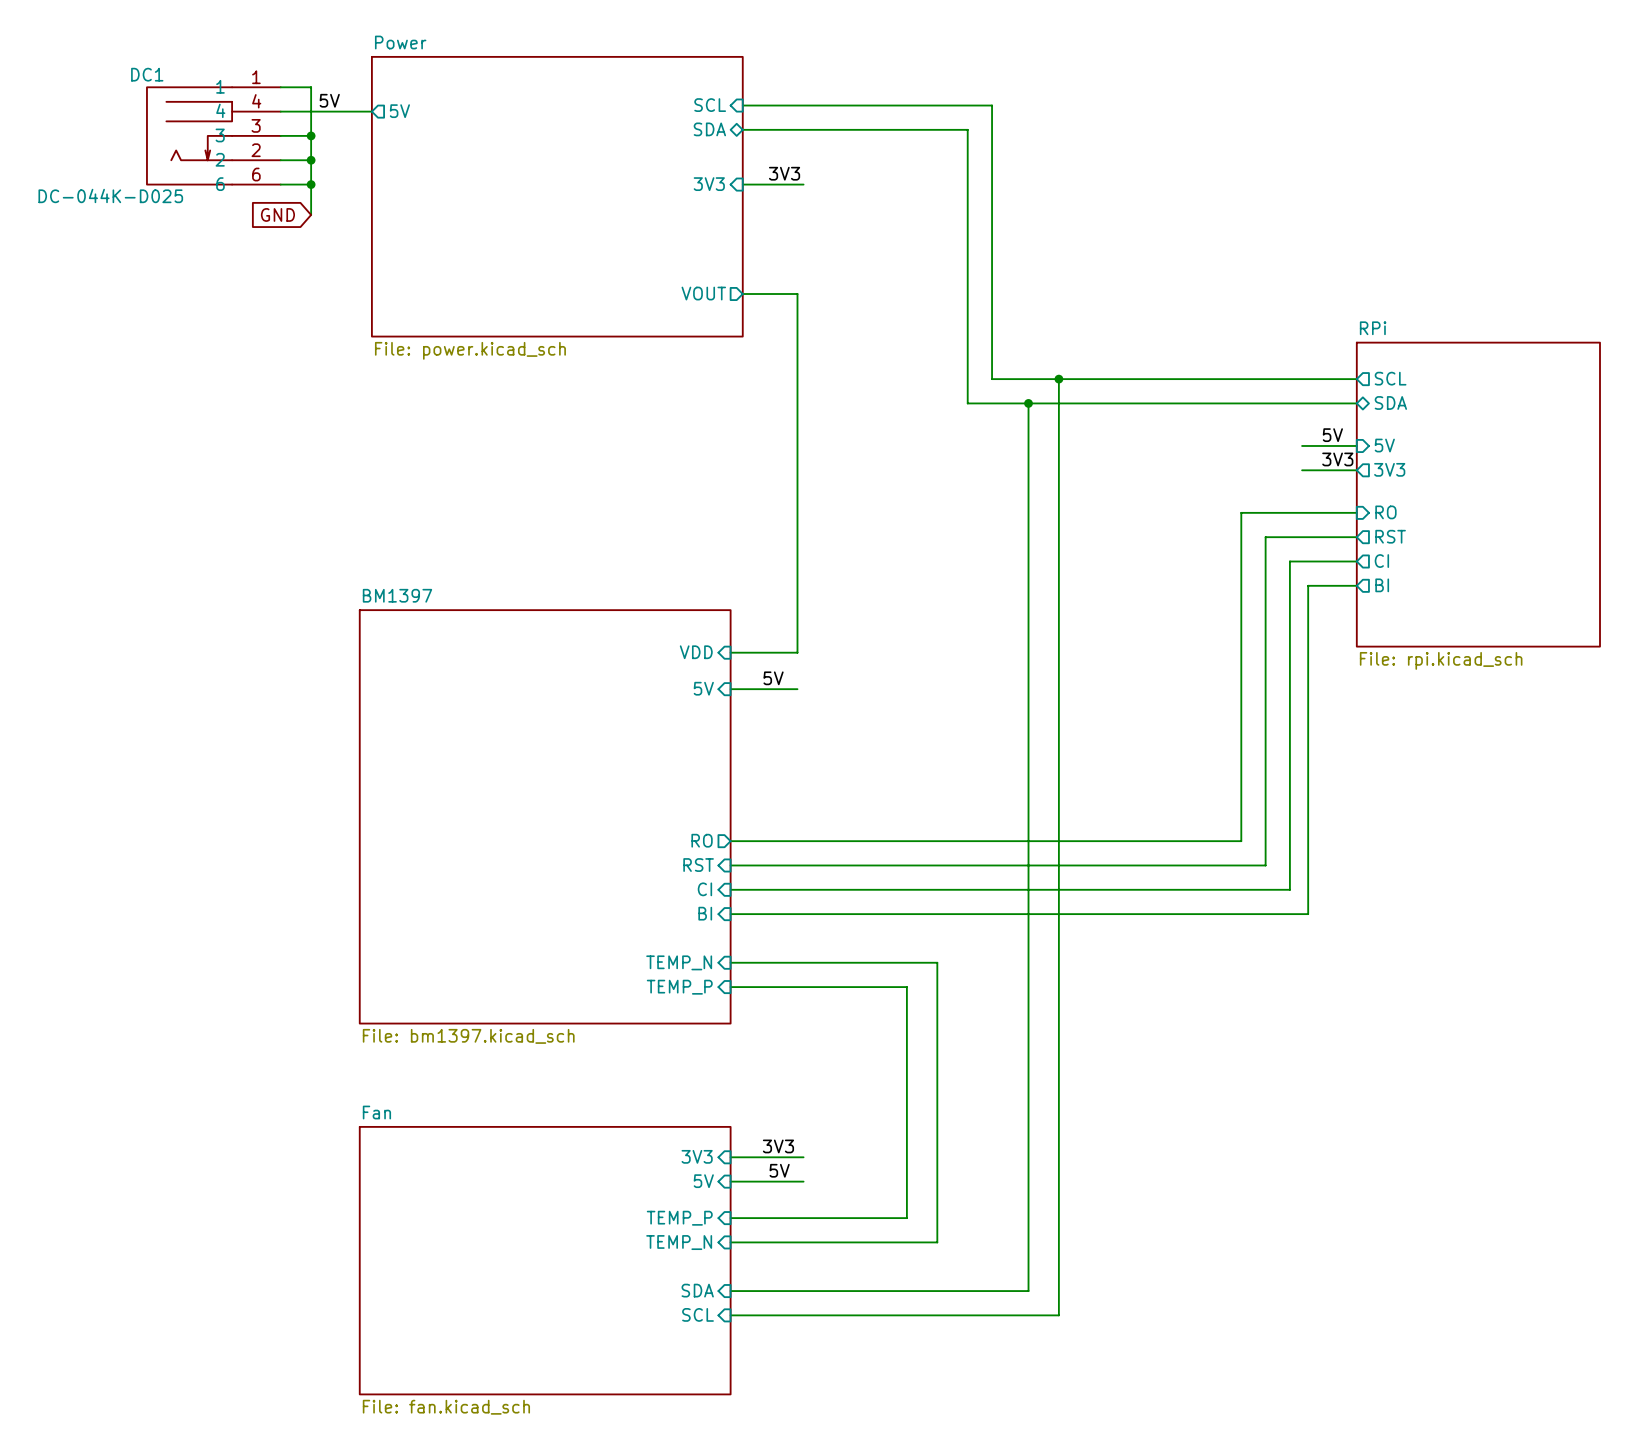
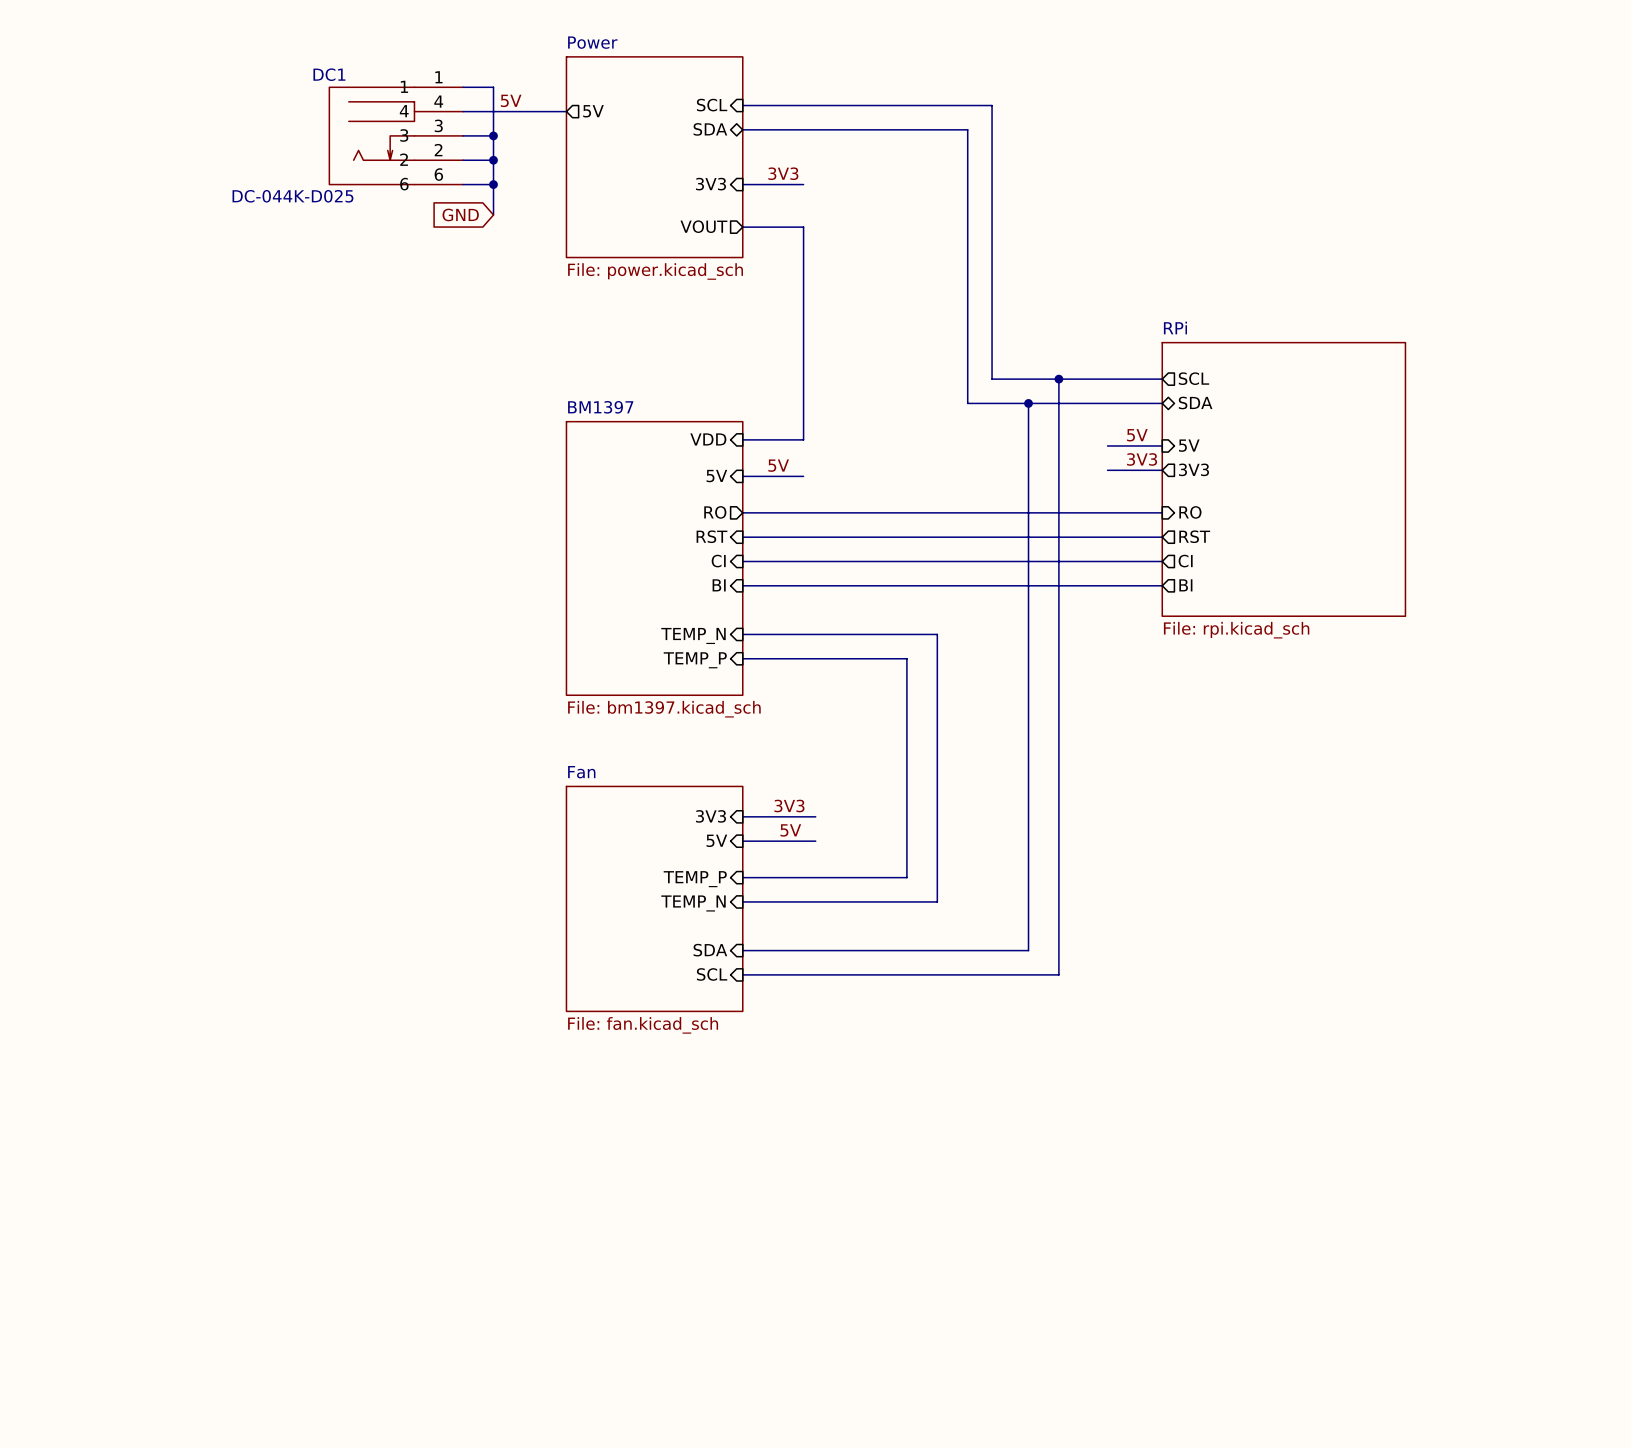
wire: (280, 87) (311, 87) (311, 214) -> (463, 87) (493, 87) (493, 214)
label position: 5V (329, 100) -> 5V (511, 100)
wire: (280, 111) (371, 111) -> none
sheet pin position: 5V (399, 111) -> 5V (593, 111)
wire: none -> (463, 111) (566, 111)
DC1 position: (213, 135) -> (396, 135)
wire: (280, 135) (311, 135) -> (463, 135) (493, 135)
junction: (311, 135) -> none
junction: none -> (493, 135)
sheet Power: none -> File: power.kicad_sch (654, 157)
wire: (280, 160) (311, 160) -> (463, 160) (493, 160)
junction: (311, 160) -> none
junction: none -> (493, 160)
wire: (280, 184) (311, 184) -> (463, 184) (493, 184)
junction: (311, 184) -> none
junction: none -> (493, 184)
sheet Power: File: power.kicad_sch (557, 196) -> none
global label position: GND (277, 214) -> GND (460, 214)
wire: none -> (742, 227) (803, 227) (803, 439) (742, 439)
sheet pin position: VOUT (703, 293) -> VOUT (703, 226)
wire: (742, 294) (797, 294) (797, 652) (730, 652) -> none
sheet pin position: SCL (1390, 378) -> SCL (1193, 378)
wire: (1162, 379) (1356, 379) -> none
sheet pin position: SDA (1390, 402) -> SDA (1195, 402)
wire: (1162, 403) (1356, 403) -> none
label position: 5V (1332, 435) -> 5V (1137, 435)
wire: (1302, 445) (1356, 445) -> (1107, 445) (1162, 445)
sheet pin position: 5V (1384, 445) -> 5V (1189, 445)
label position: 3V3 (1337, 459) -> 3V3 (1142, 459)
label: none -> 5V (778, 465)
sheet pin position: 3V3 (1389, 469) -> 3V3 (1193, 469)
wire: (1302, 470) (1356, 470) -> (1107, 470) (1162, 470)
sheet pin: none -> 5V (716, 476)
wire: none -> (742, 476) (803, 476)
sheet RPi: none -> File: rpi.kicad_sch (1283, 479)
sheet RPi: File: rpi.kicad_sch (1478, 494) -> none
sheet pin: none -> RO (715, 512)
wire: none -> (742, 512) (1162, 512)
wire: (1356, 512) (1241, 512) (1241, 841) (815, 841) -> none
sheet pin position: RO (1385, 512) -> RO (1190, 512)
sheet pin: none -> RST (711, 536)
sheet pin position: RST (1390, 536) -> RST (1194, 536)
wire: none -> (742, 537) (1162, 537)
wire: (1356, 537) (1265, 537) (1265, 865) (730, 865) -> none
sheet pin: none -> CI (718, 561)
wire: none -> (742, 561) (1162, 561)
wire: (1356, 561) (1289, 561) (1289, 889) (730, 889) -> none
sheet pin position: CI (1381, 561) -> CI (1185, 561)
sheet pin: none -> BI (719, 585)
wire: none -> (742, 585) (1162, 585)
wire: (1356, 585) (1308, 585) (1308, 914) (730, 914) -> none
sheet pin position: BI (1382, 585) -> BI (1185, 585)
sheet BM1397 name position: BM1397 (397, 595) -> BM1397 (600, 407)
sheet BM1397 shape: [359, 609, 732, 1025] -> [565, 420, 744, 696]
sheet pin: none -> TEMP_N (693, 635)
wire: none -> (742, 634) (937, 634) (937, 901) (742, 901)
sheet pin position: VDD (696, 652) -> VDD (708, 439)
sheet pin: none -> TEMP_P (695, 660)
wire: none -> (742, 658) (906, 658) (906, 877) (742, 877)
label: 5V (773, 678) -> none
sheet pin: 5V (703, 688) -> none
wire: (730, 689) (797, 689) -> none
label: none -> 3V3 (789, 806)
sheet pin: none -> 3V3 (710, 816)
wire: none -> (742, 816) (815, 816)
label: none -> 5V (790, 830)
sheet pin: RO (702, 840) -> none
sheet pin: none -> 5V (716, 840)
wire: (730, 841) (742, 841) -> none
sheet pin: RST (698, 865) -> none
sheet pin: CI (704, 889) -> none
sheet Fan: none -> File: fan.kicad_sch (654, 898)
sheet pin: BI (705, 913) -> none
sheet pin: none -> SDA (710, 950)
wire: (1028, 950) (1028, 1291) (730, 1291) -> (1028, 950) (742, 950)
sheet pin position: TEMP_N (679, 962) -> TEMP_N (693, 903)
wire: (730, 962) (937, 962) (937, 1242) (730, 1242) -> none
sheet pin: none -> SCL (712, 974)
wire: (1058, 974) (1058, 1315) (730, 1315) -> (1058, 974) (742, 974)
sheet pin position: TEMP_P (679, 987) -> TEMP_P (695, 879)
wire: (730, 987) (906, 987) (906, 1218) (730, 1218) -> none
sheet BM1397 value position: File: bm1397.kicad_sch (468, 1036) -> File: bm1397.kicad_sch (664, 709)
label: 3V3 (778, 1146) -> none
sheet pin: 3V3 (697, 1156) -> none
wire: (730, 1157) (803, 1157) -> none
label: 5V (779, 1170) -> none
sheet pin: 5V (703, 1181) -> none
wire: (730, 1181) (803, 1181) -> none
sheet pin: TEMP_P (679, 1218) -> none
sheet pin: TEMP_N (679, 1242) -> none
sheet Fan: File: fan.kicad_sch (545, 1260) -> none
sheet pin: SDA (697, 1290) -> none
sheet pin: SCL (698, 1314) -> none

